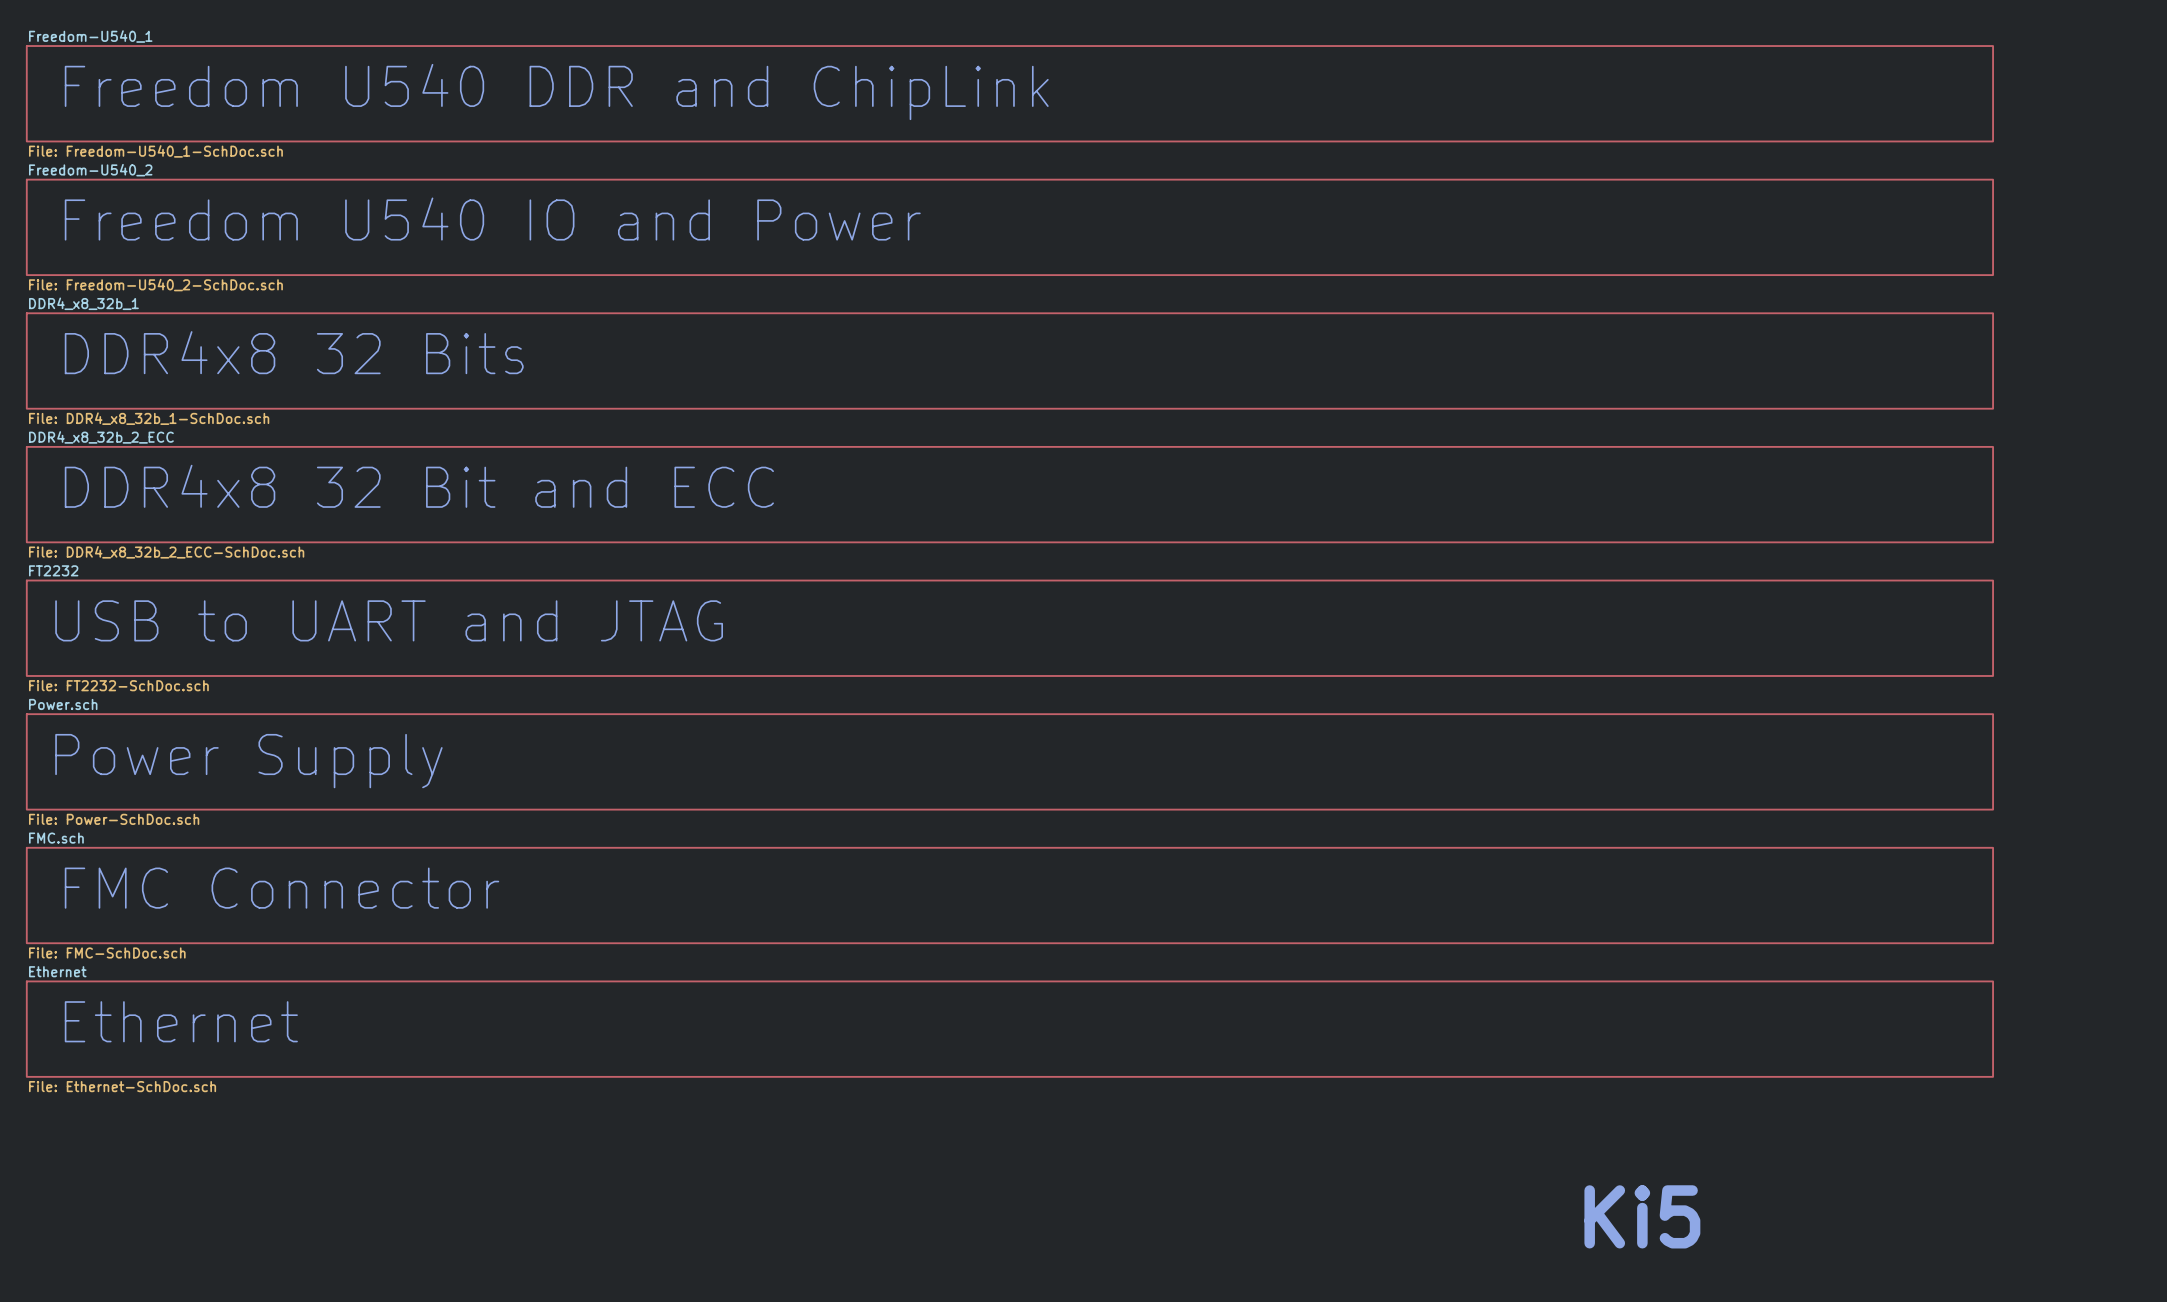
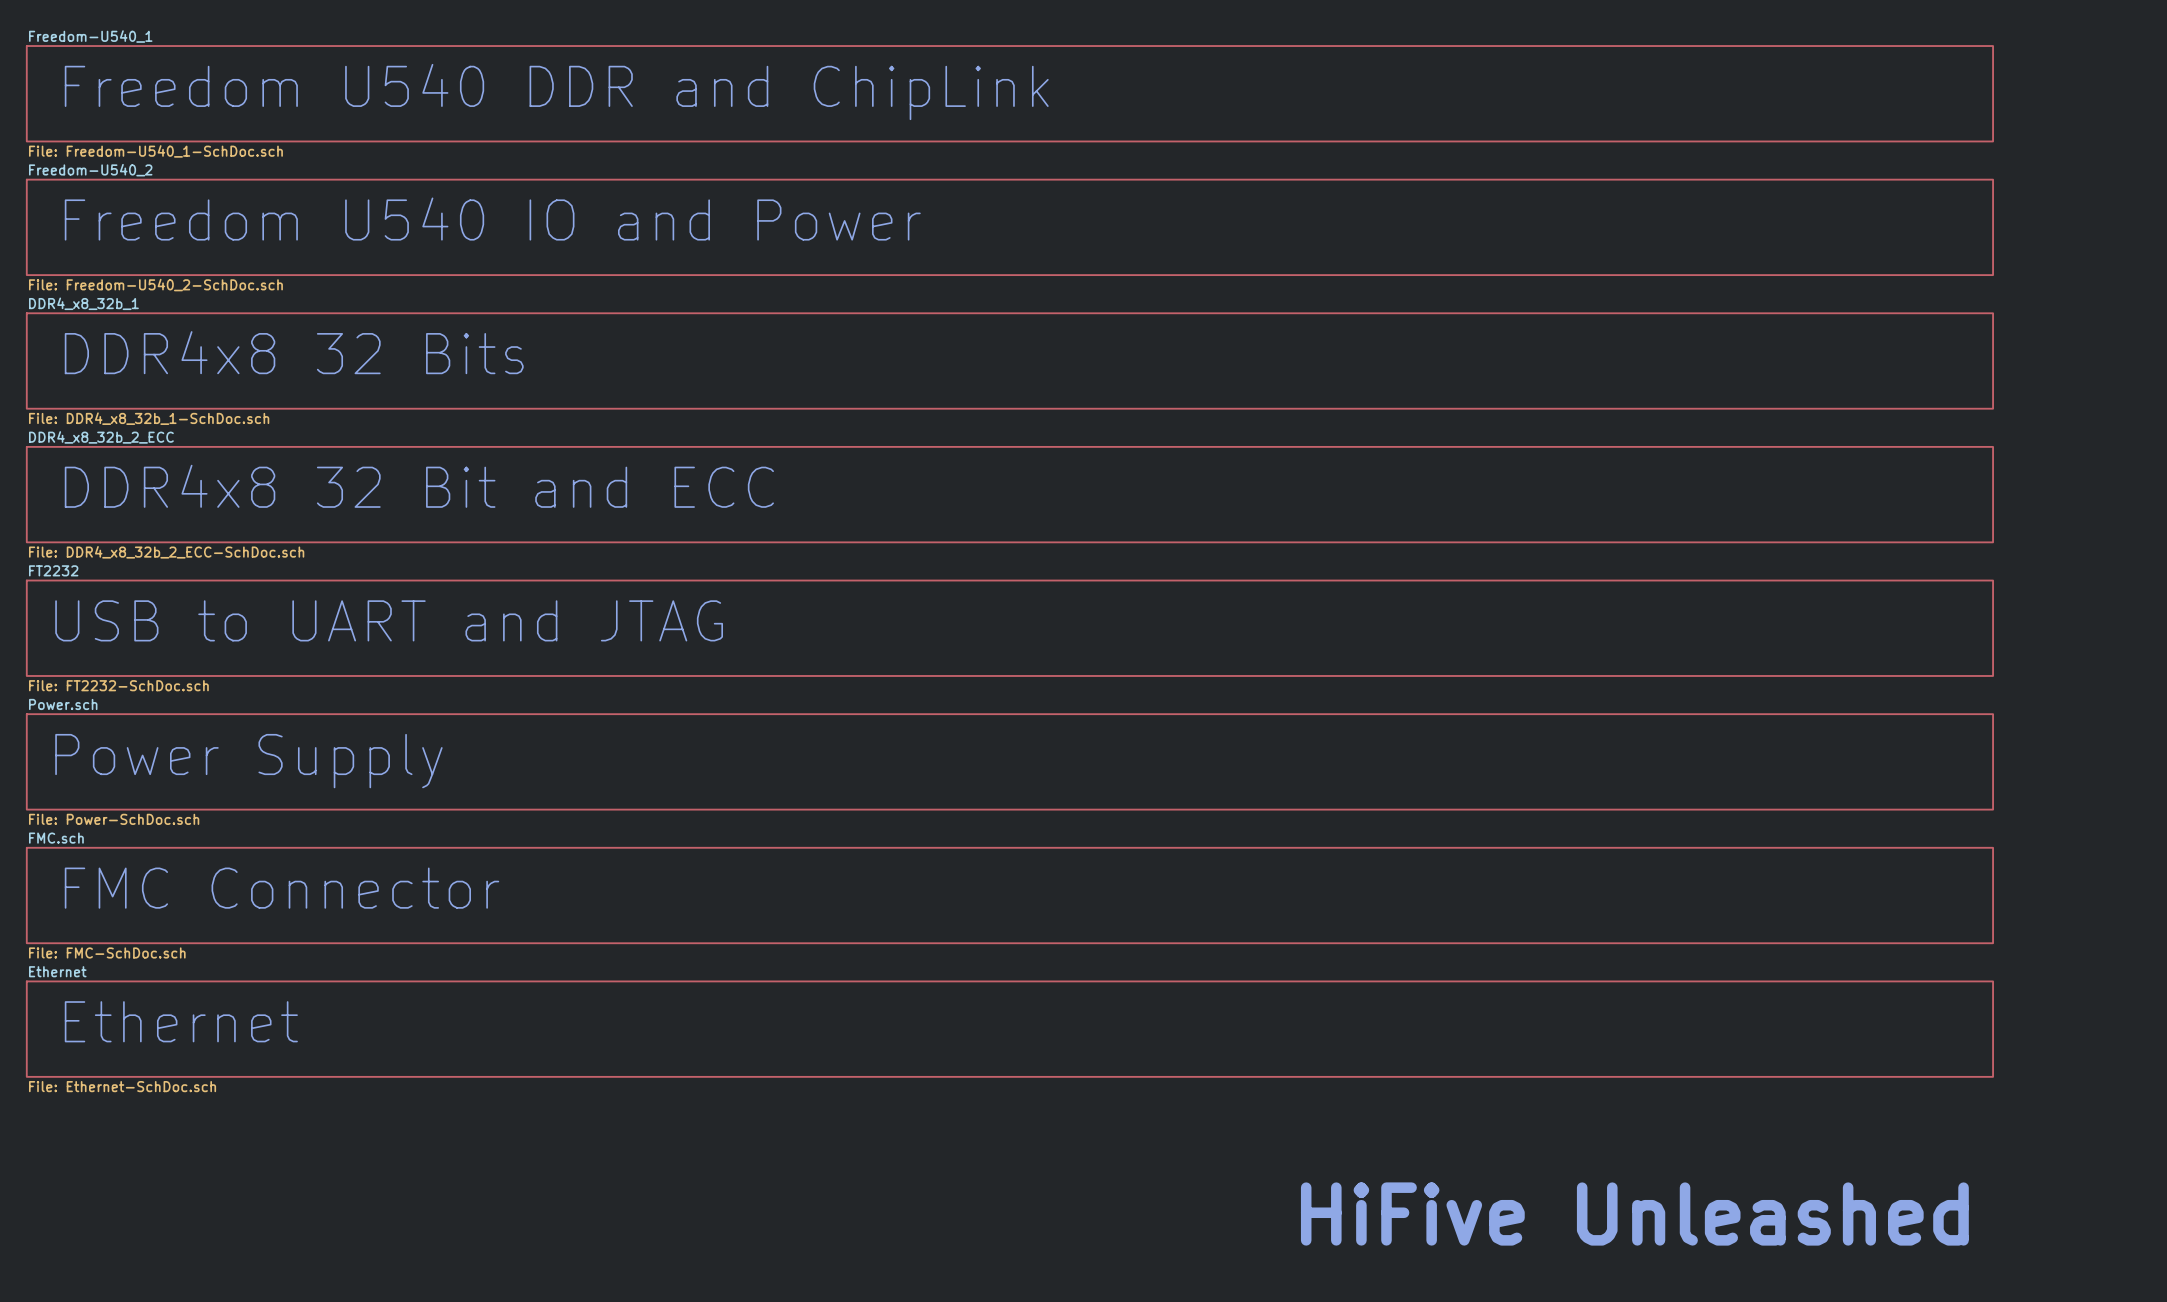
text: none -> HiFive Unleashed (1634, 1214)
text: Ki5 (1642, 1216) -> none

